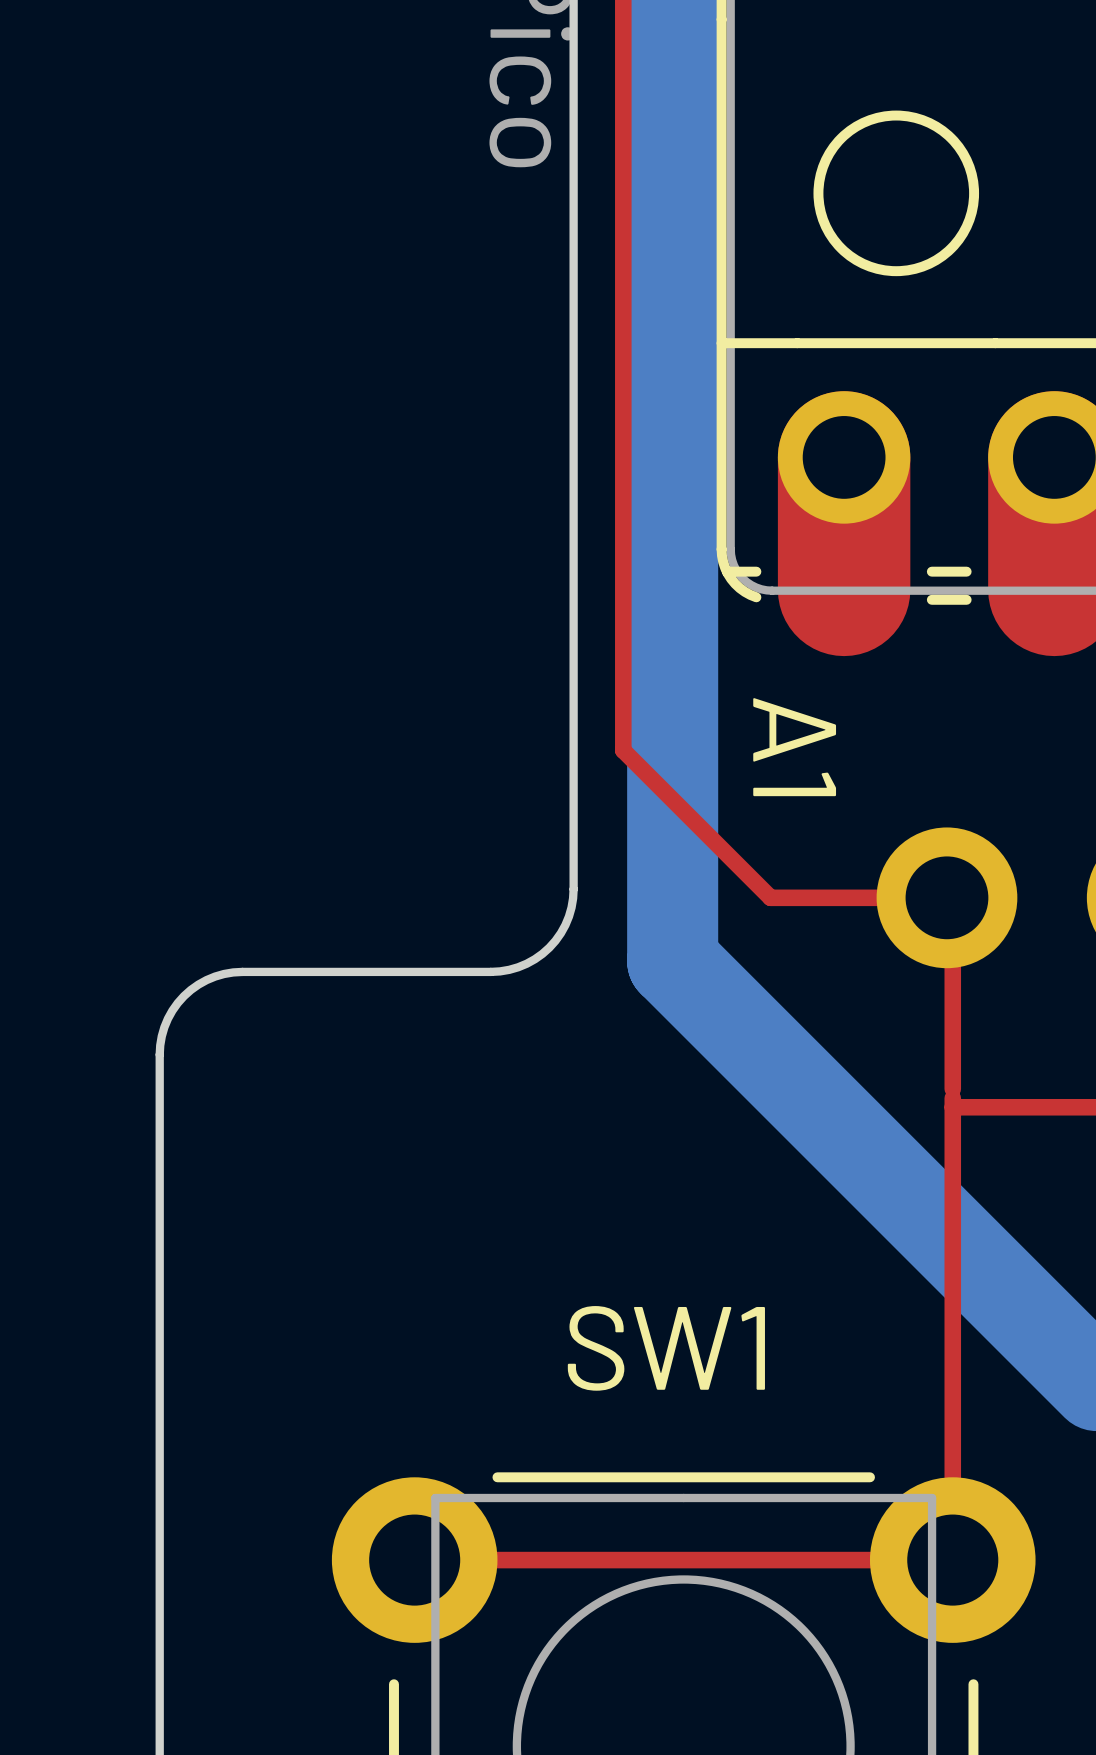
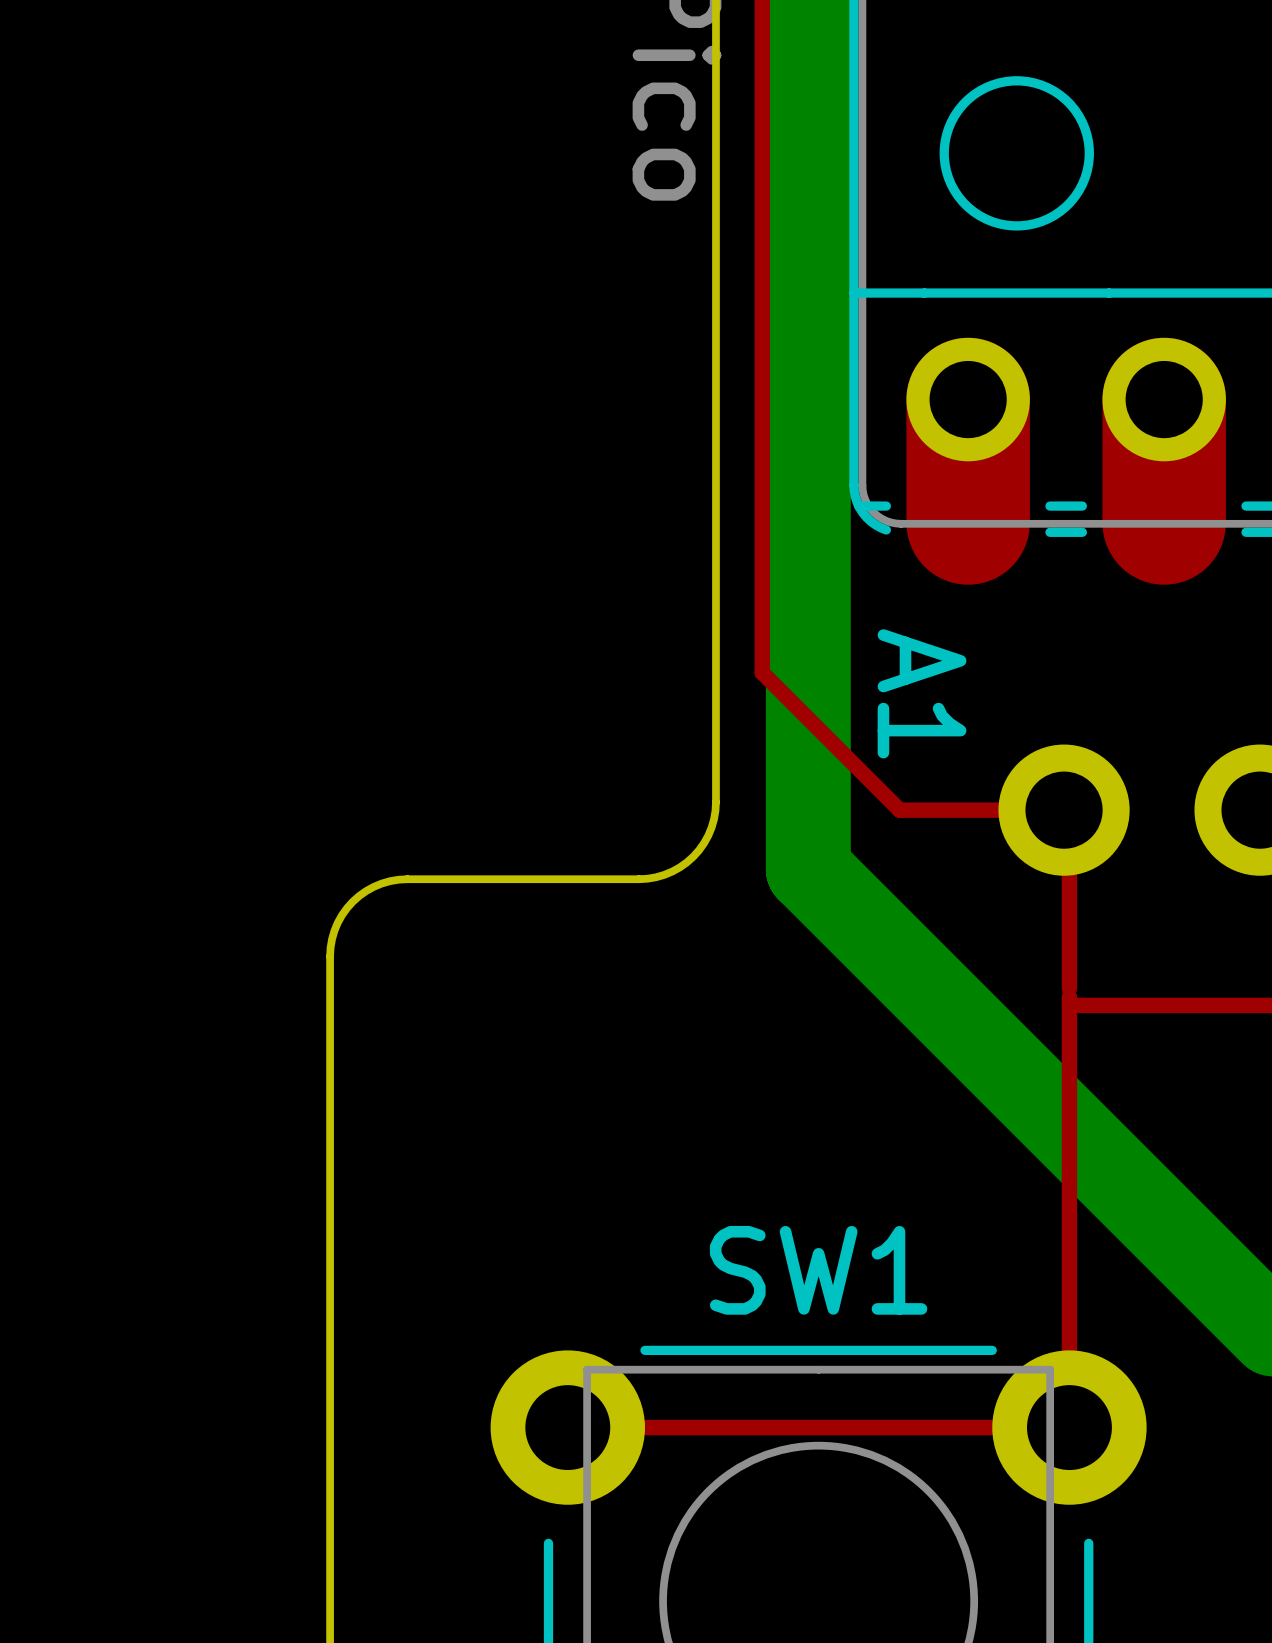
SW1 name position: SW1 (666, 1348) -> SW1 (818, 1270)

